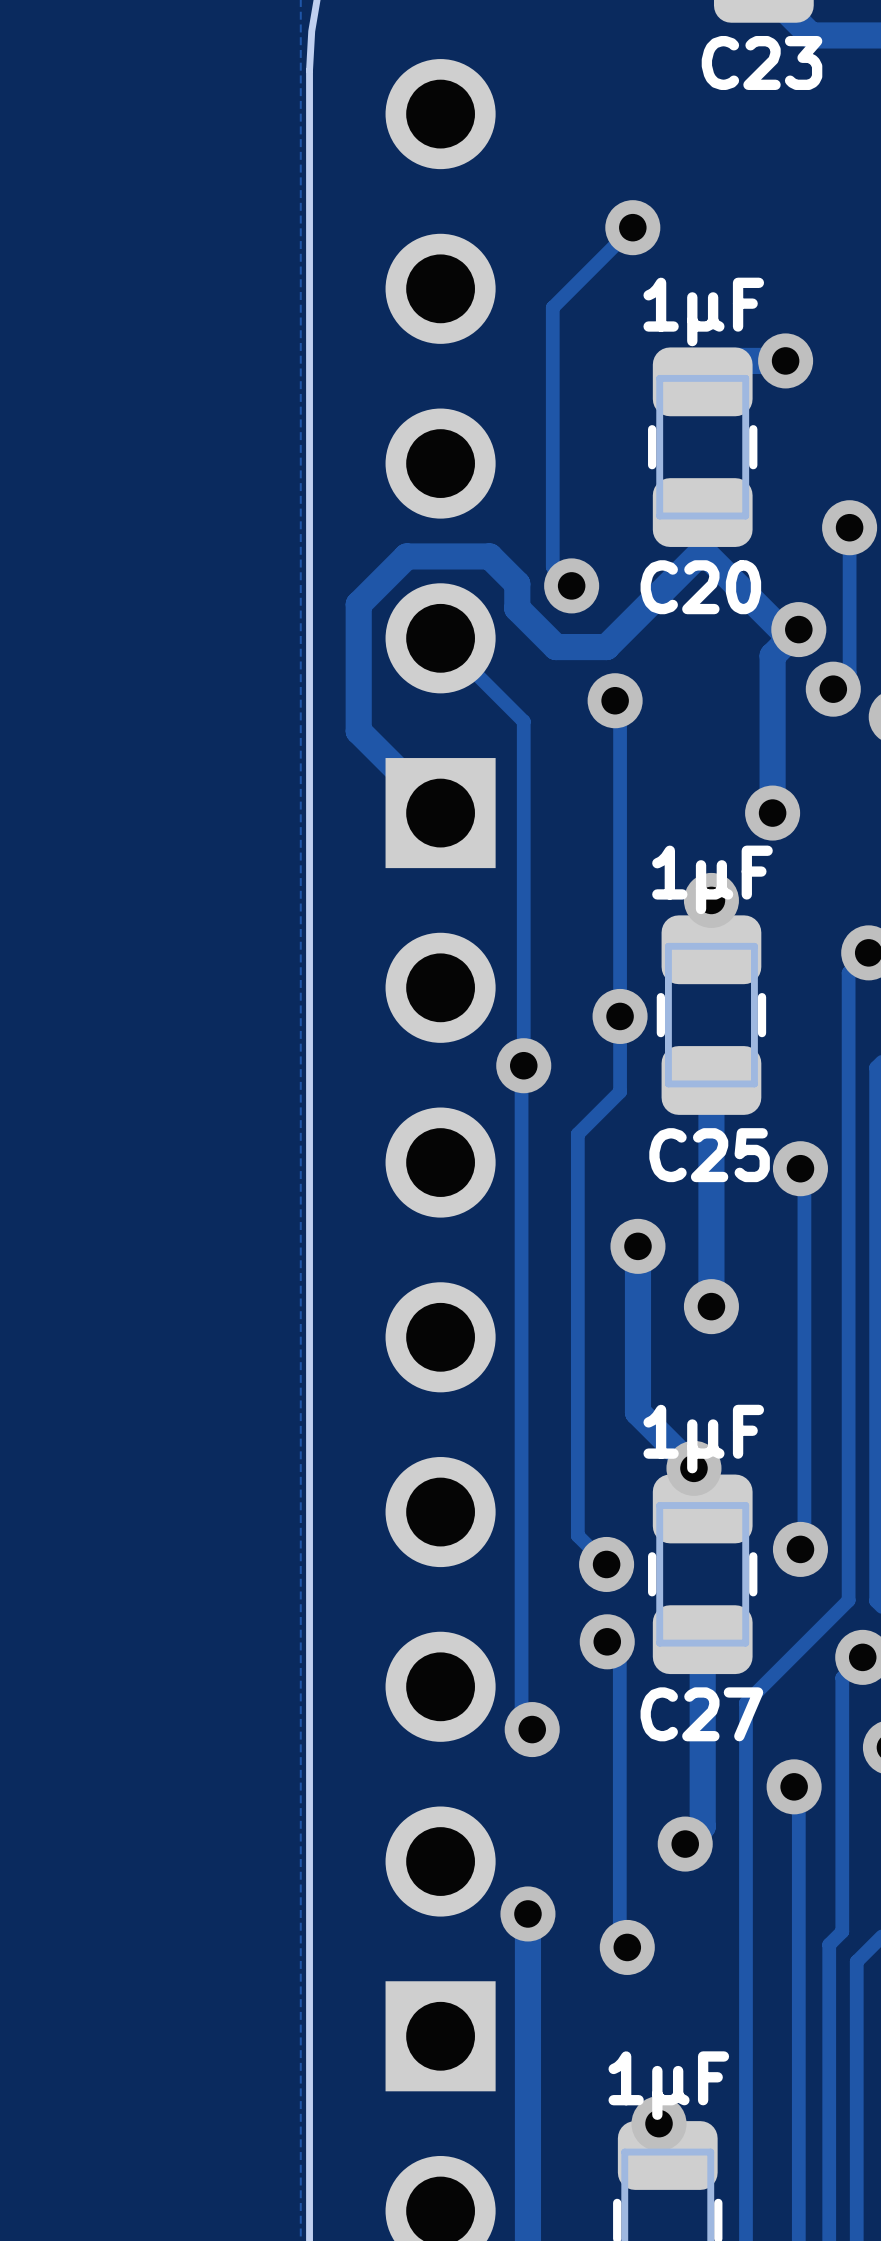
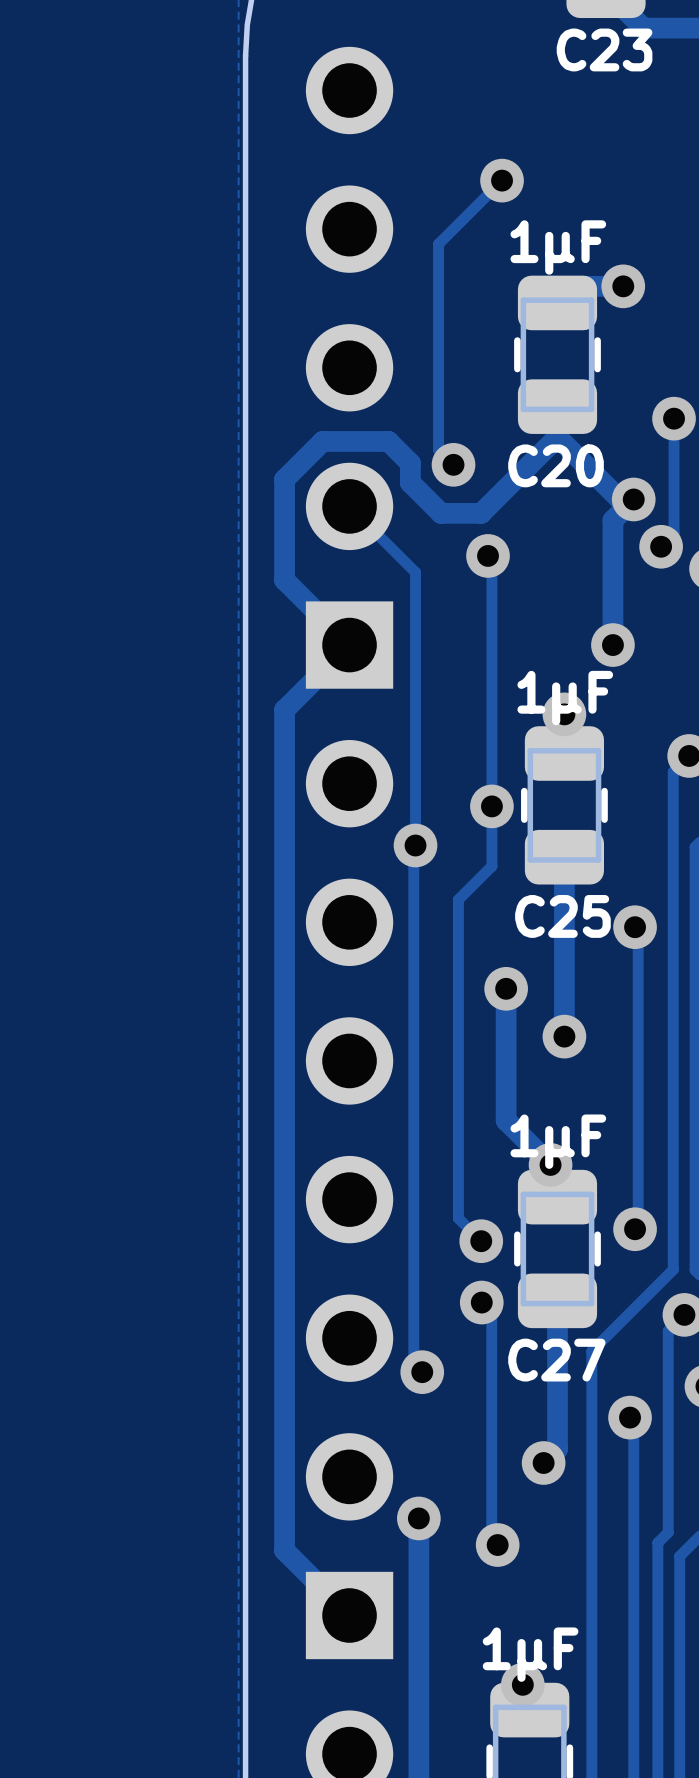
track: none -> (349, 645) (284, 710) (284, 1550) (349, 1615)

